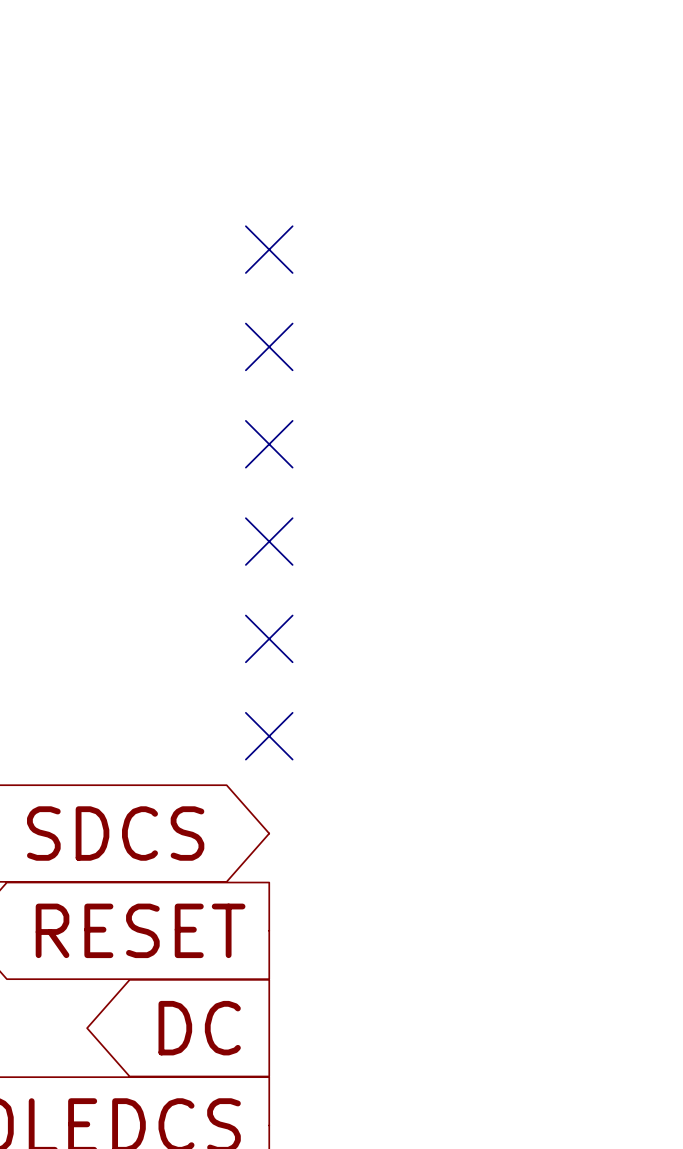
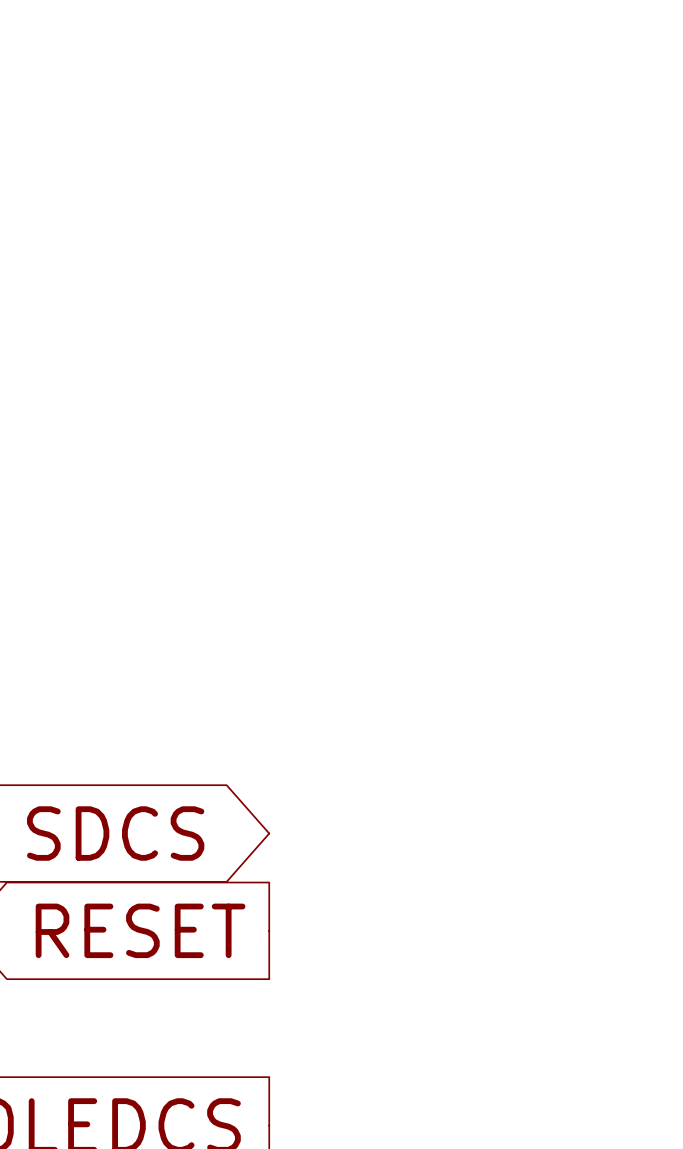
no-connect mark: (269, 249) -> none
no-connect mark: (269, 346) -> none
no-connect mark: (269, 444) -> none
no-connect mark: (269, 541) -> none
no-connect mark: (269, 638) -> none
no-connect mark: (269, 736) -> none
global label: DC (199, 1028) -> none

